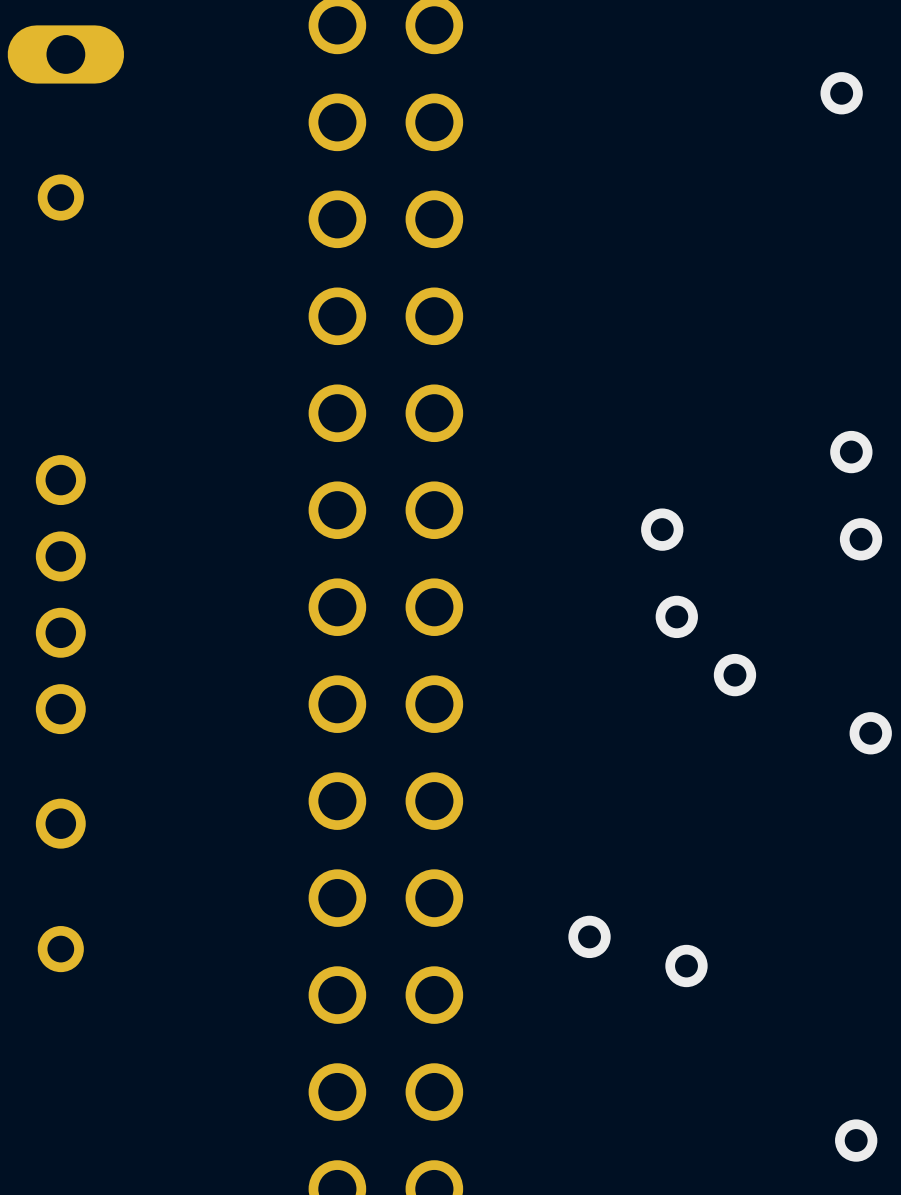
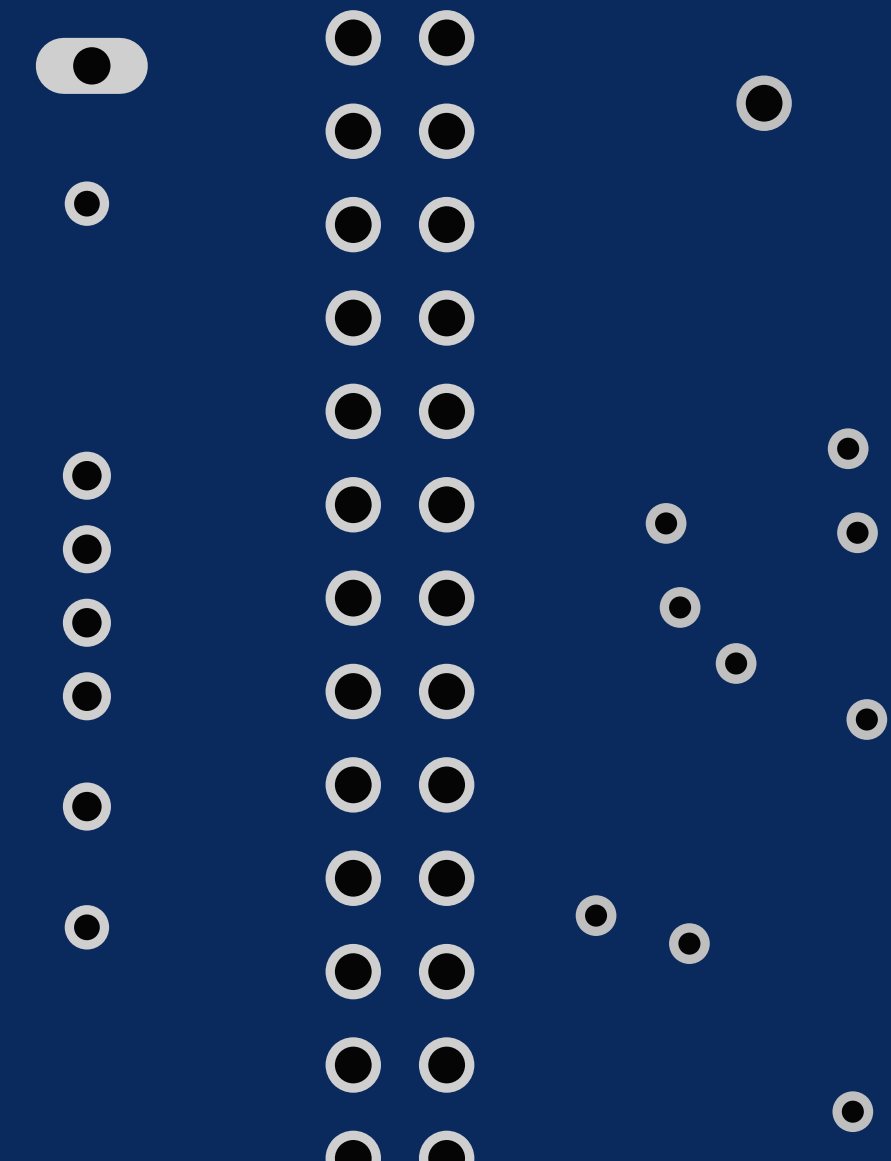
via: none -> (764, 103)
via: (841, 93) -> none

